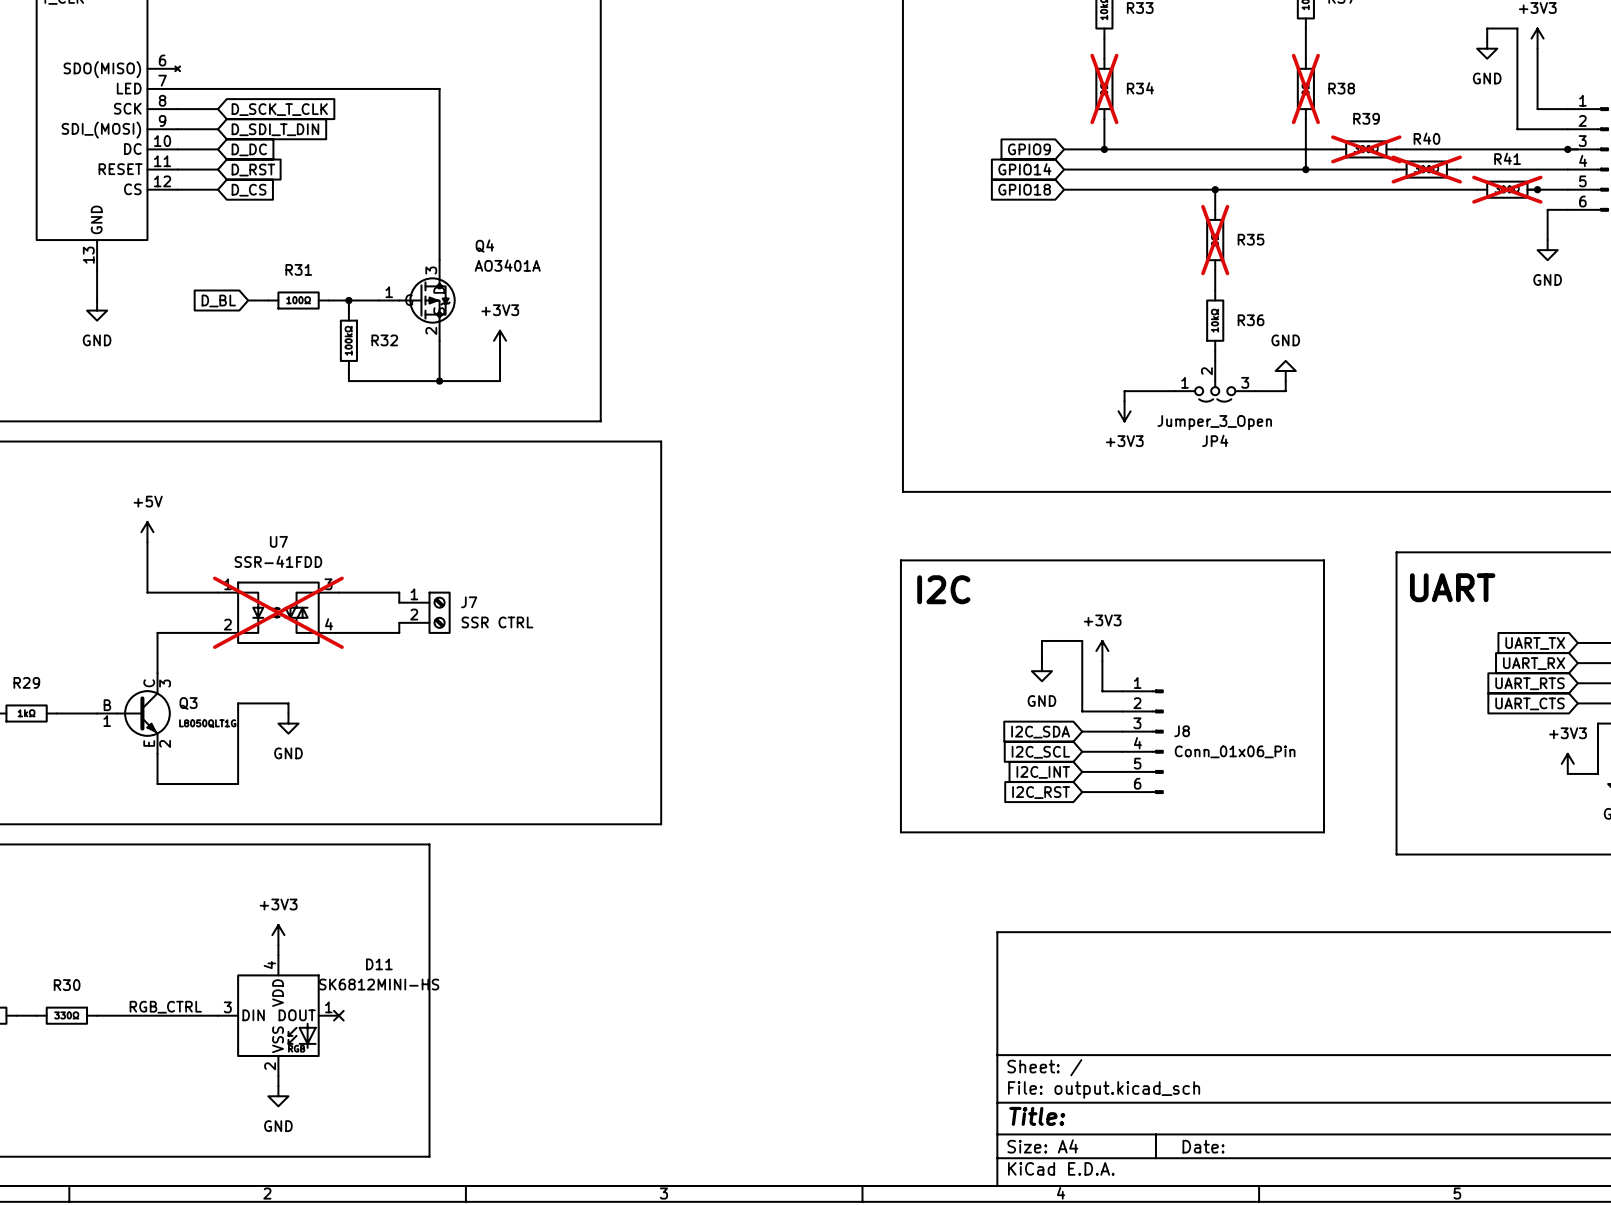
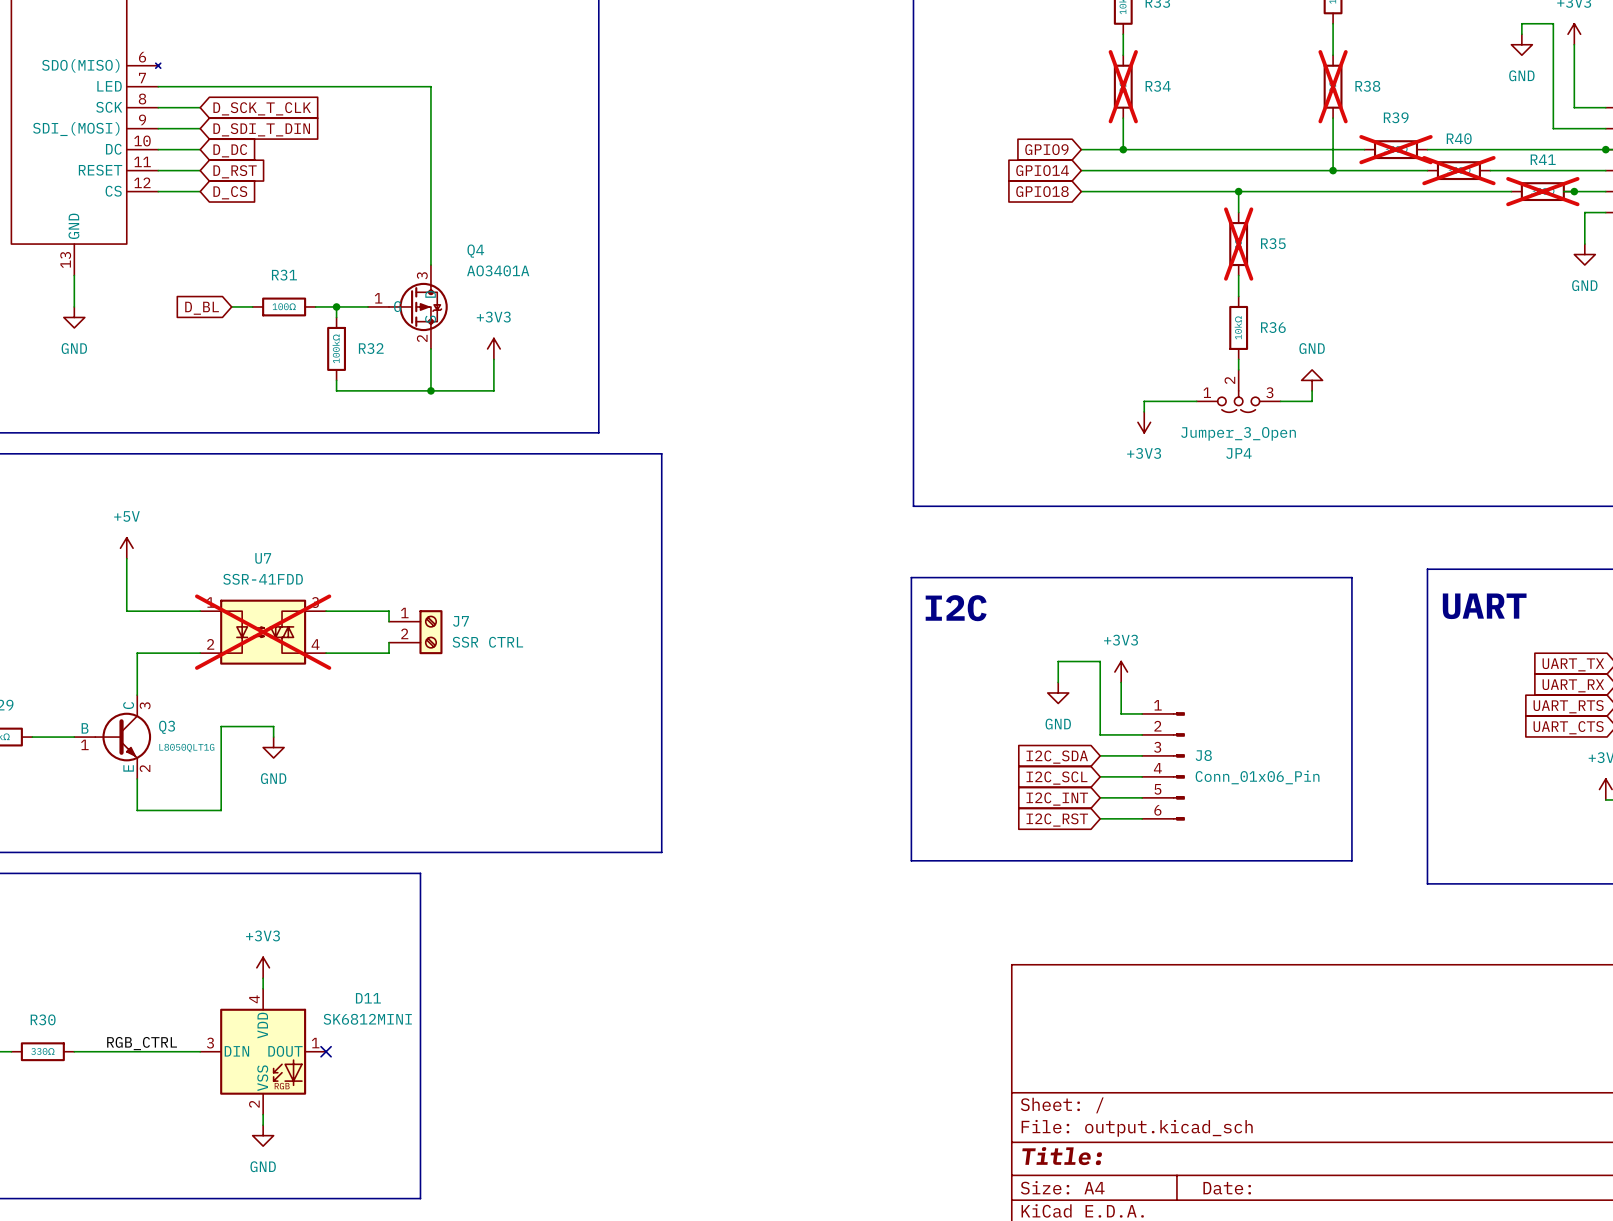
D11 value: SK6812MINI-HS (379, 984) -> SK6812MINI (367, 1019)

